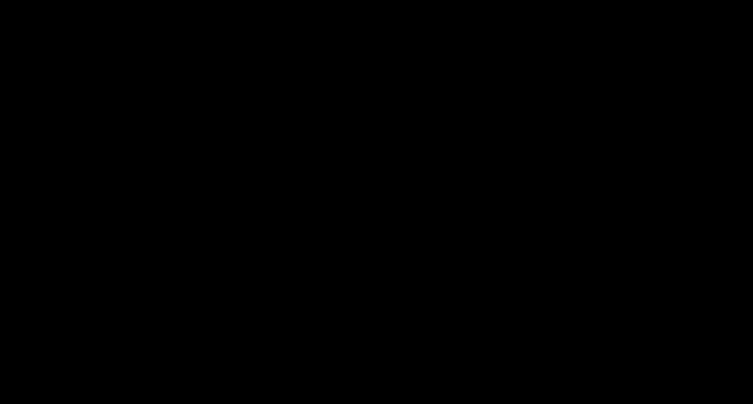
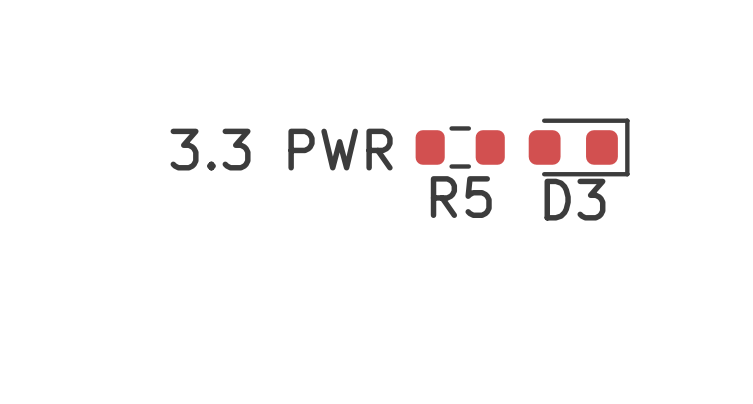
R5: none -> (460, 147)
D3: none -> (579, 147)
text: none -> 3.3 PWR (281, 149)

